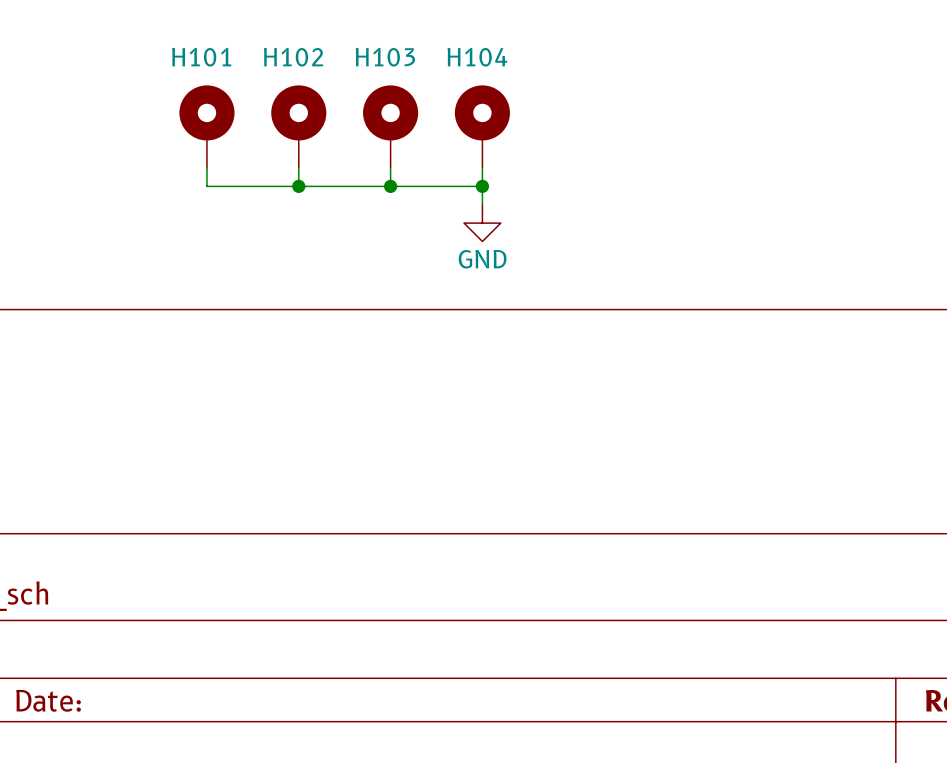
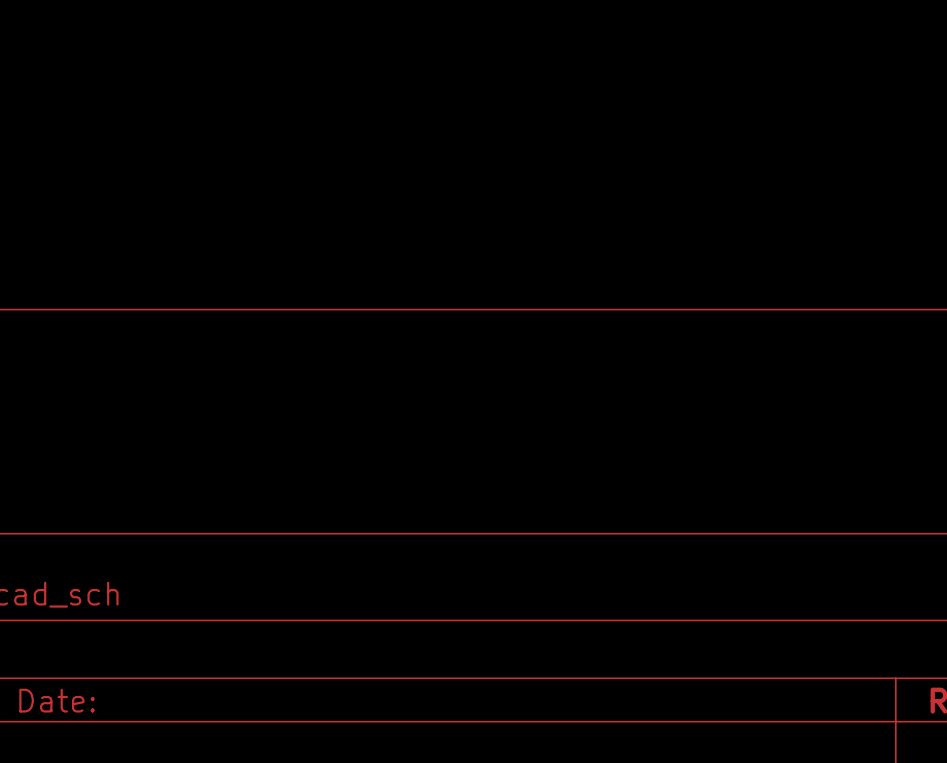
H101: (206, 126) -> none
H102: (298, 126) -> none
H103: (390, 126) -> none
H104: (482, 126) -> none
wire: (206, 168) (206, 186) (482, 186) -> none
wire: (298, 168) (298, 186) -> none
wire: (390, 168) (390, 186) -> none
wire: (482, 168) (482, 204) -> none
junction: (298, 186) -> none
junction: (390, 186) -> none
junction: (482, 186) -> none
power symbol: GND (482, 223) -> none

